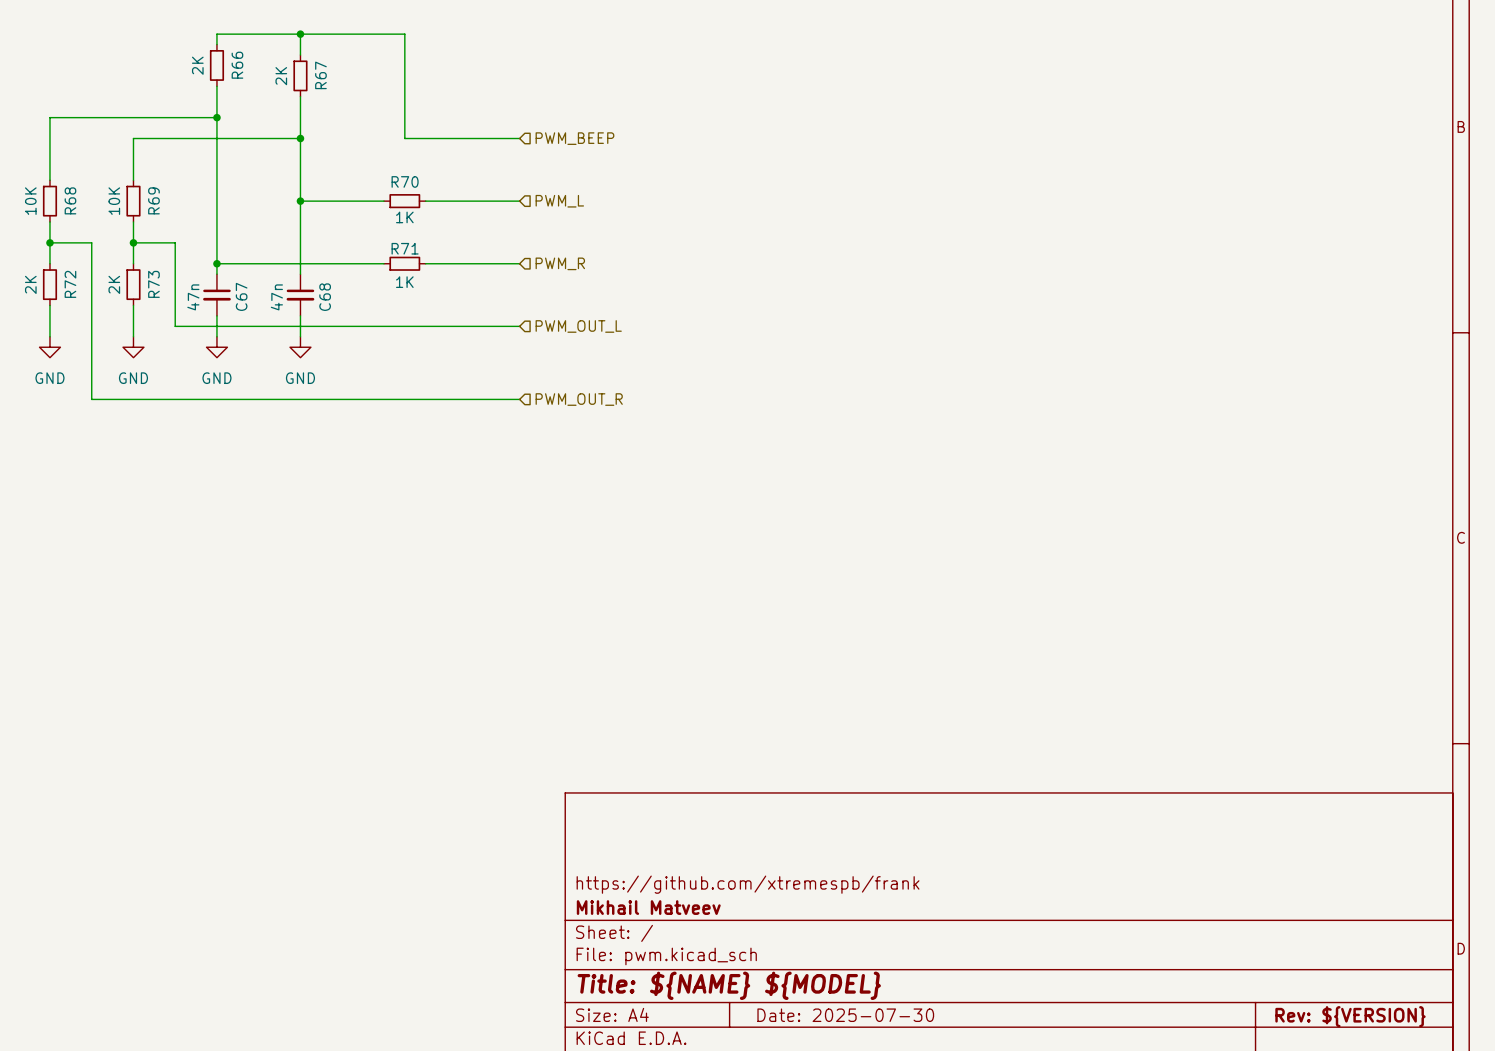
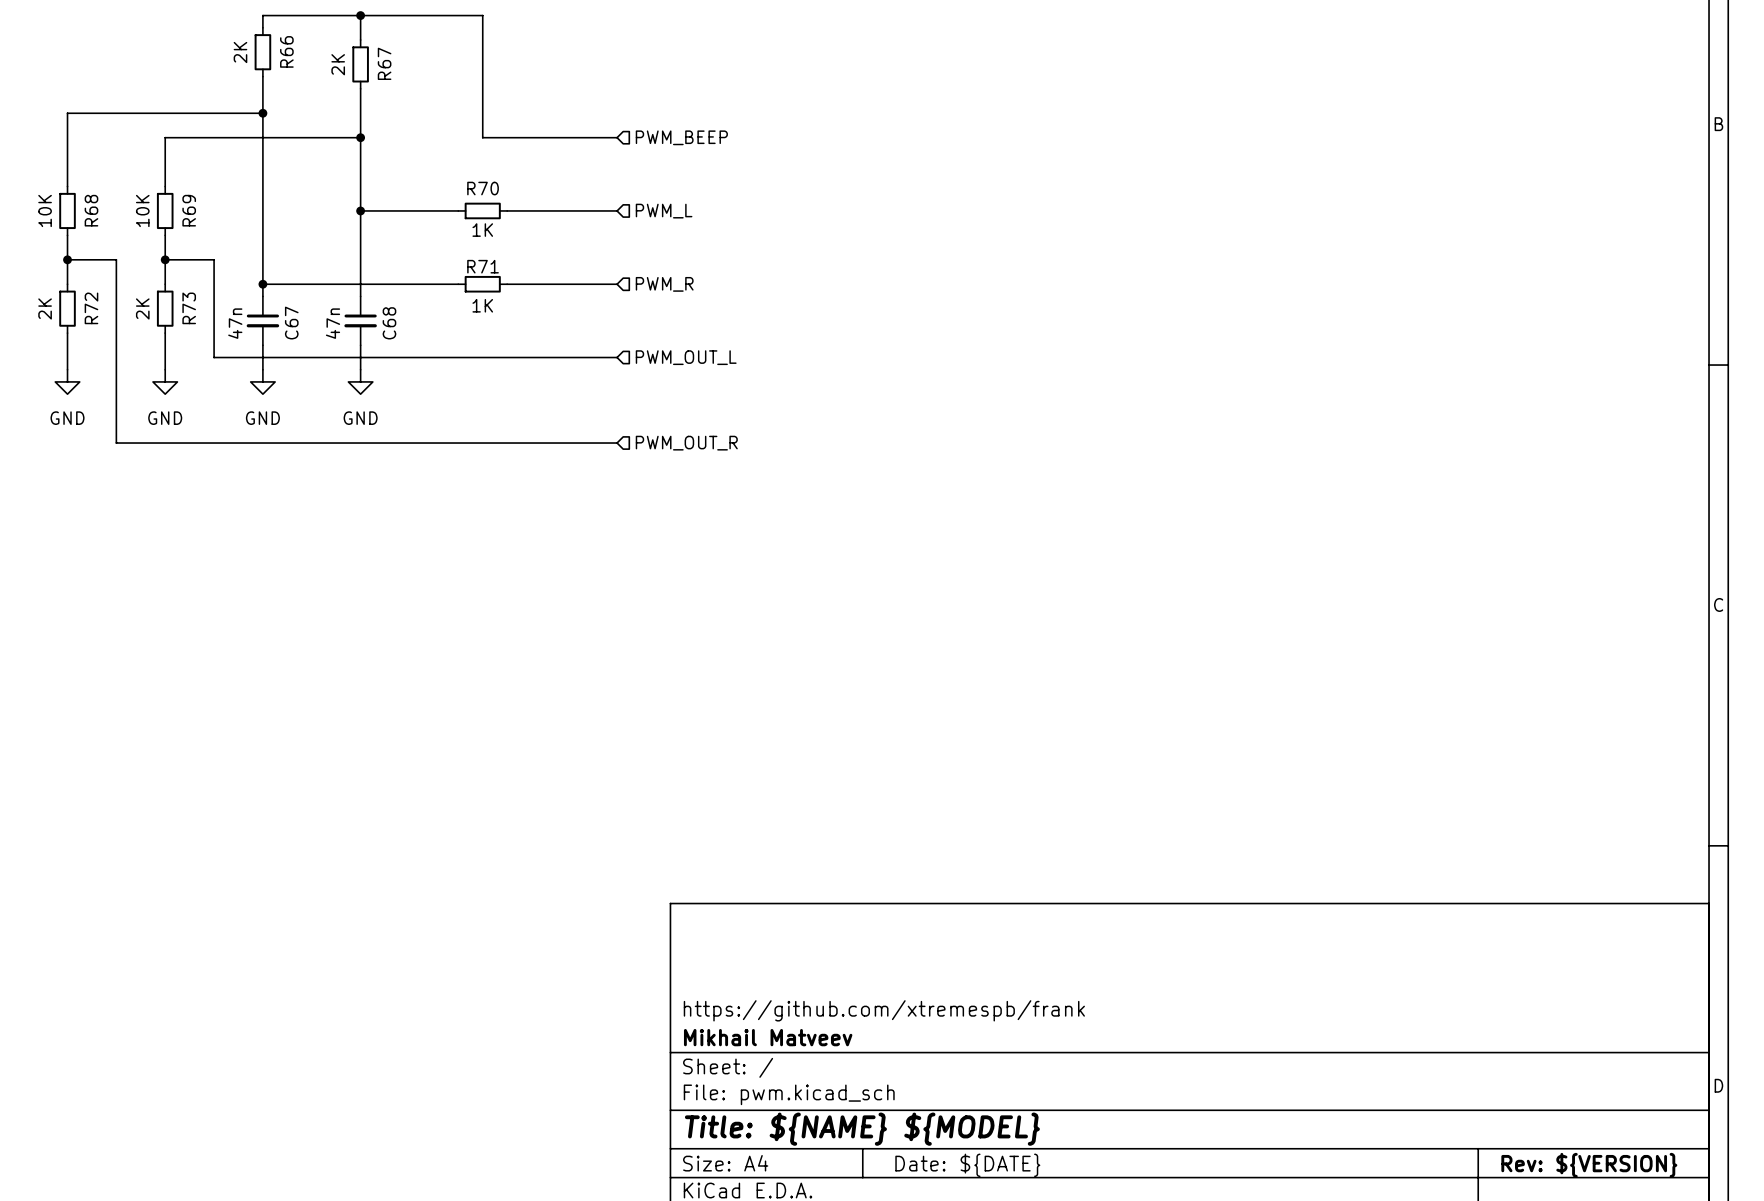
title block: Date: 2025-07-30 (845, 1015) -> Date: ${DATE} (967, 1165)

